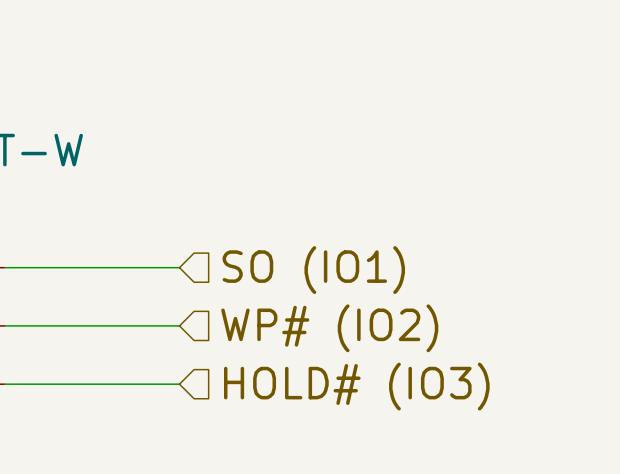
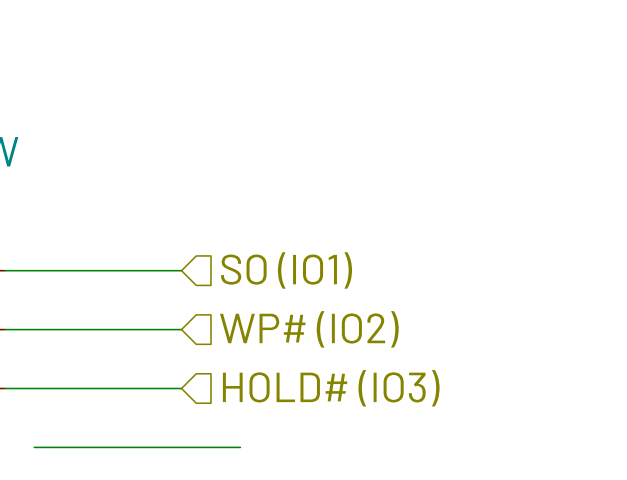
wire: none -> (34, 447) (240, 447)

